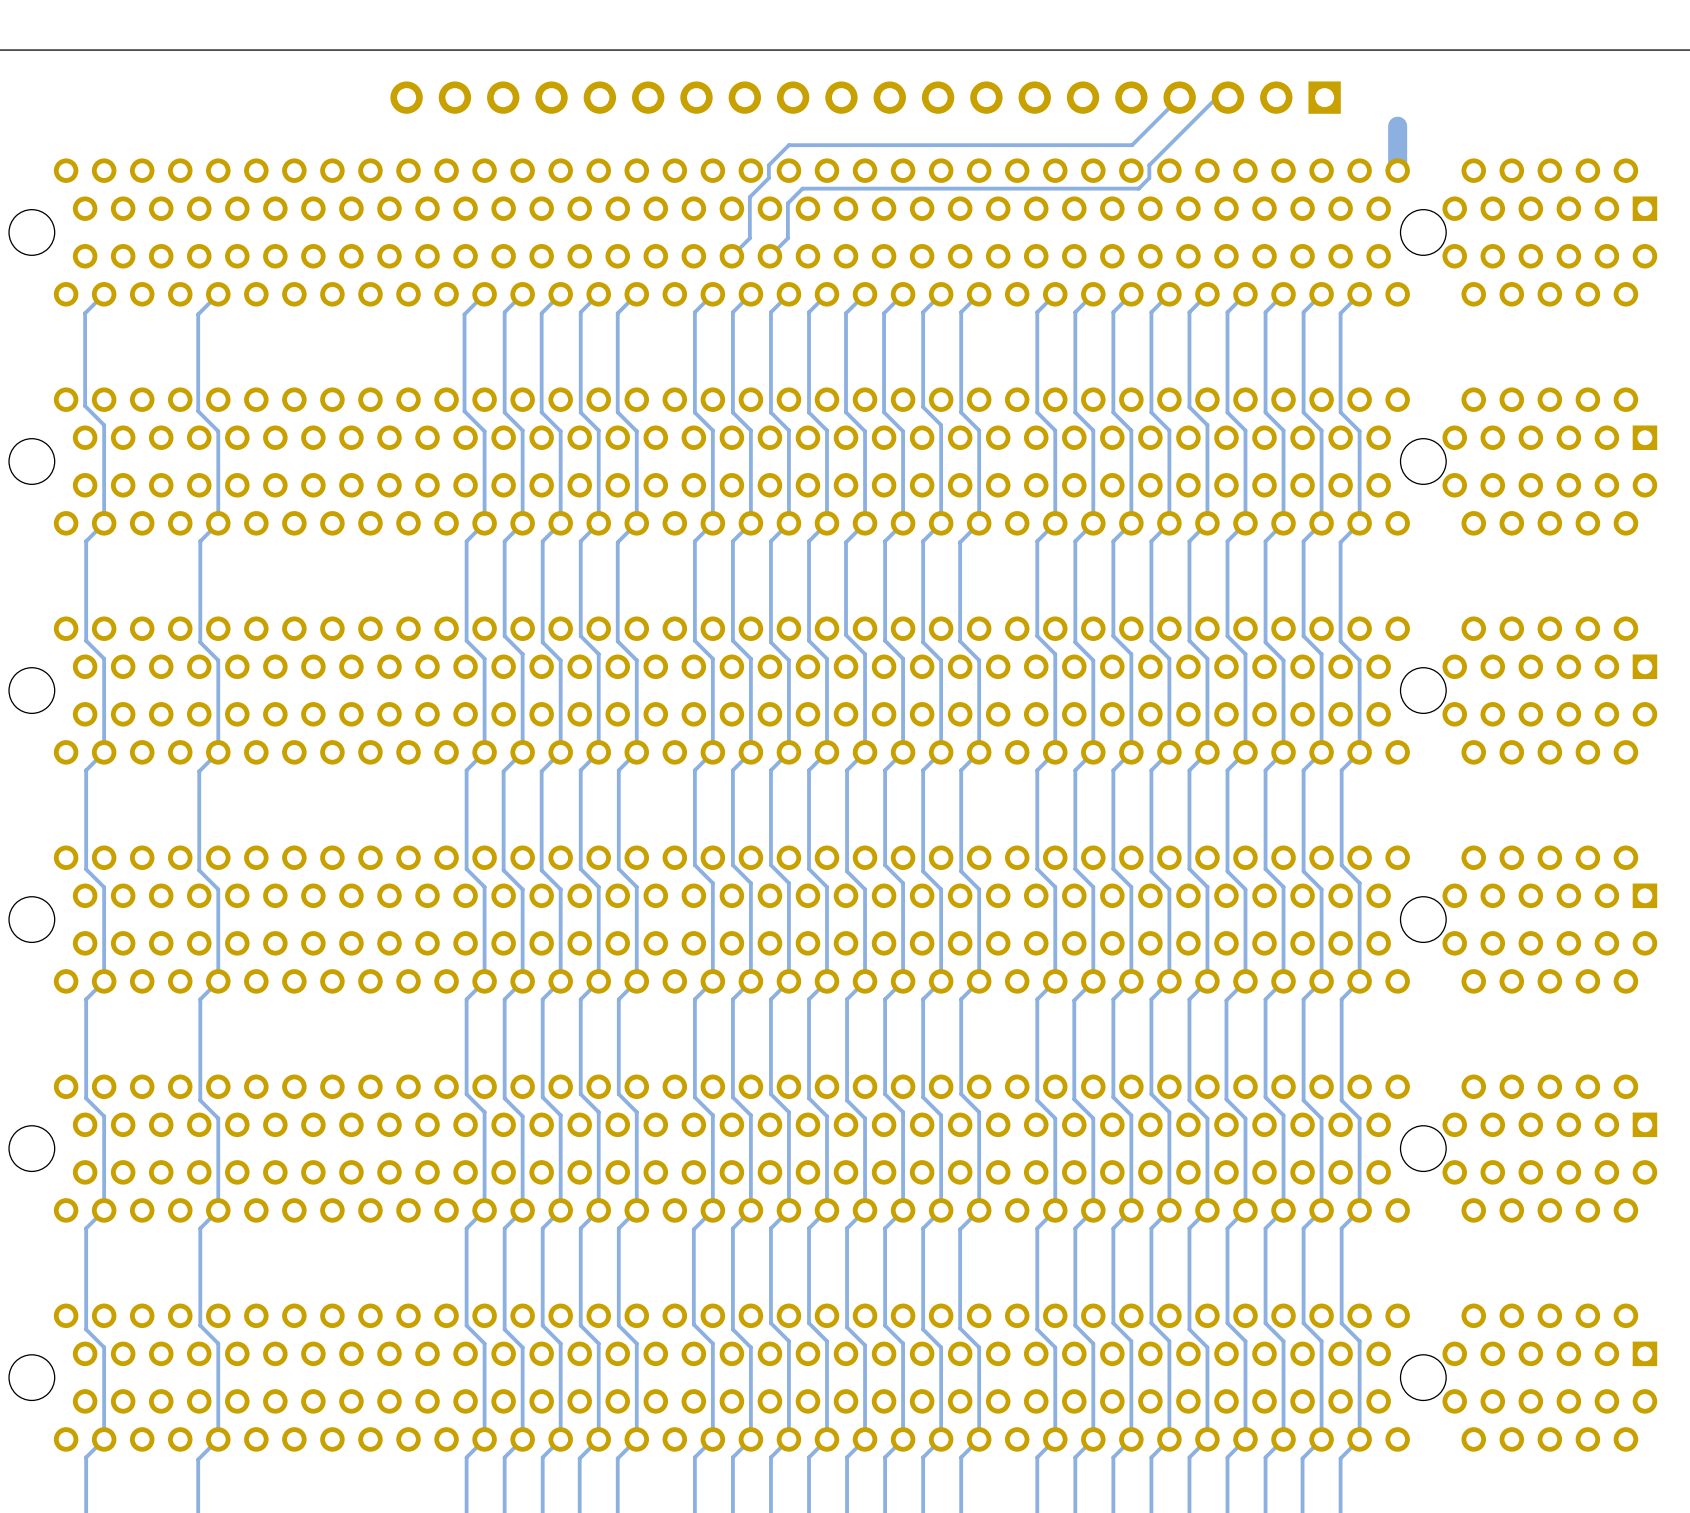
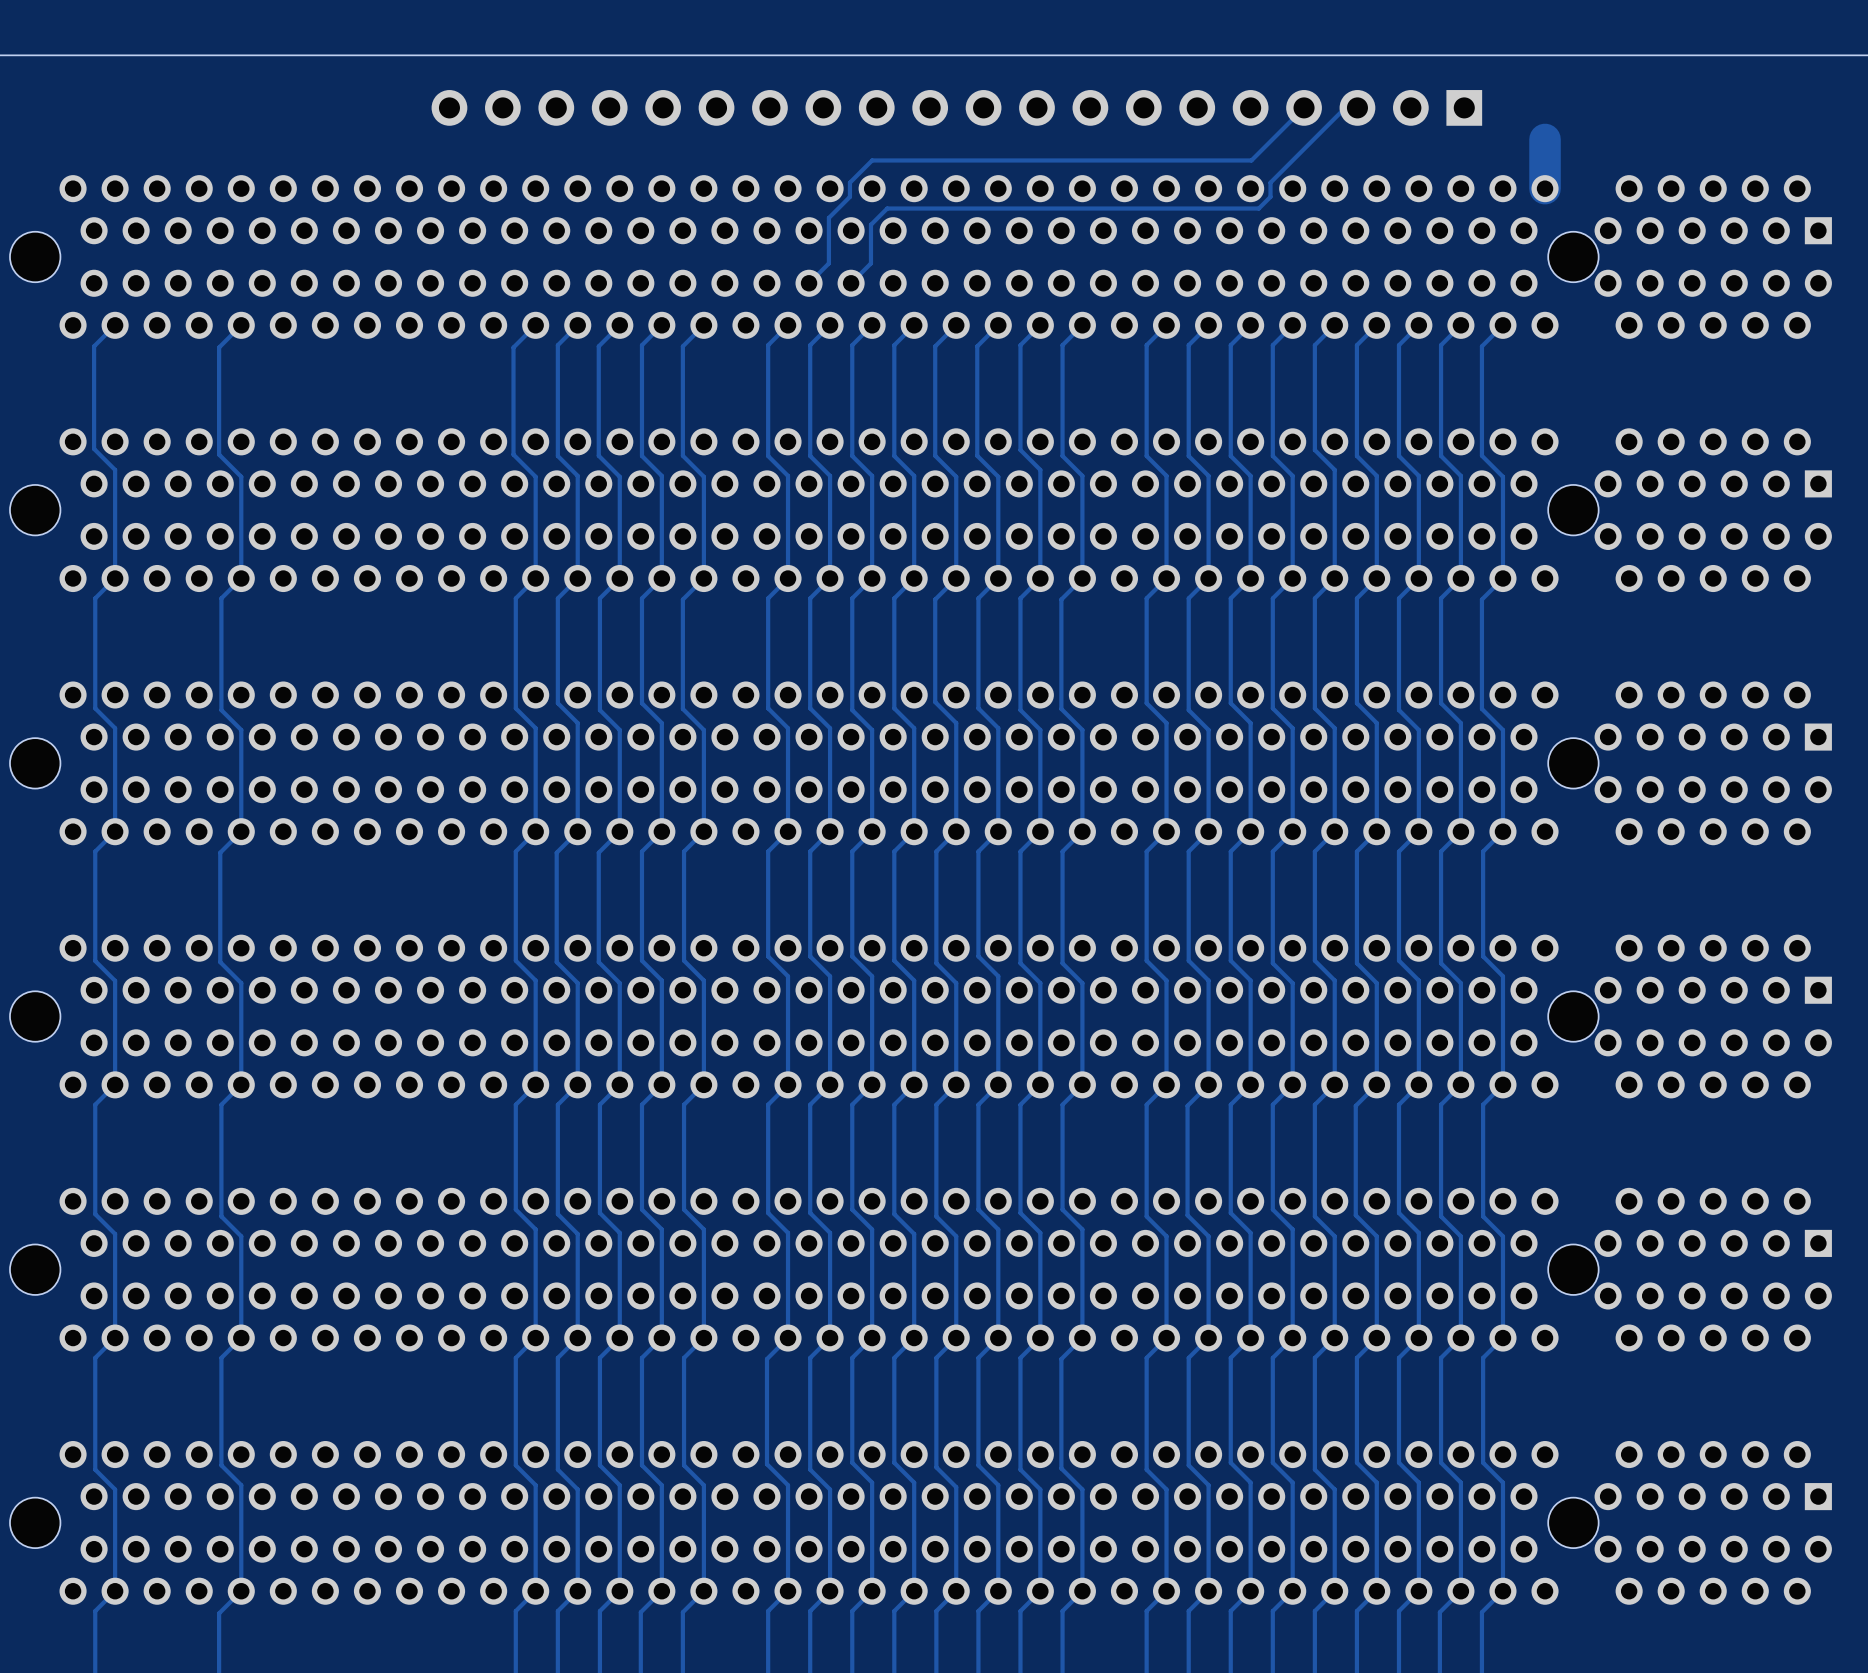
track width: thin (1397, 126) (1397, 170) -> thick (1545, 139) (1545, 188)

